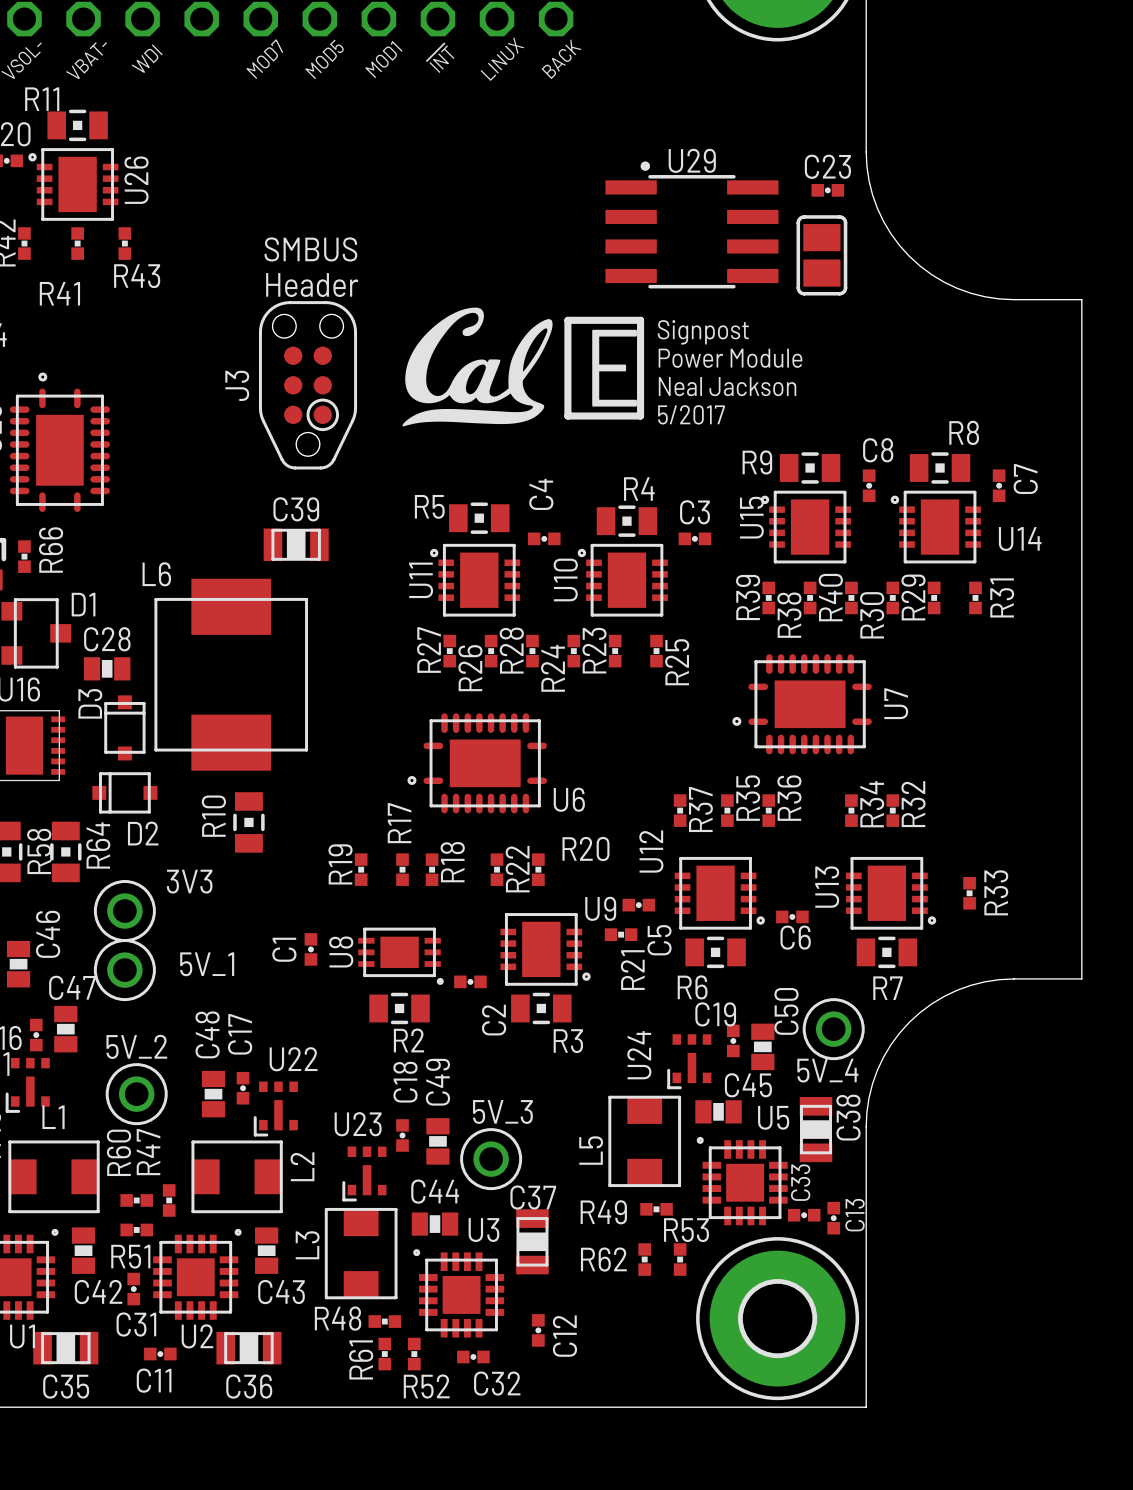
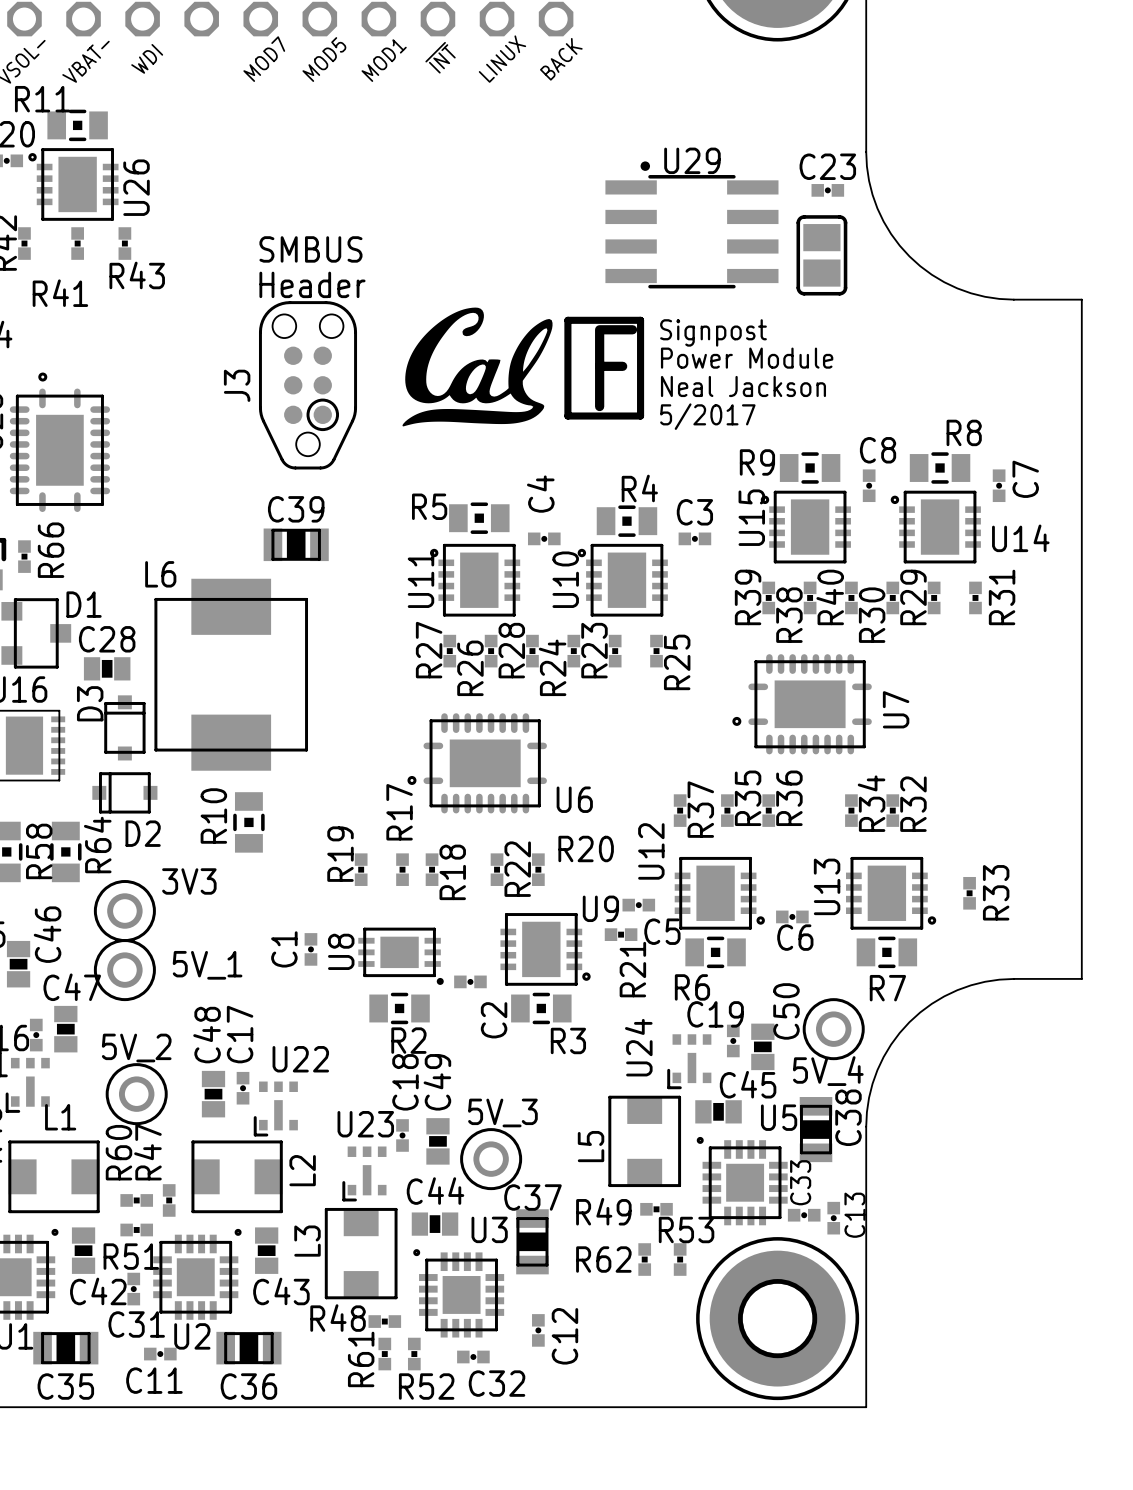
text: E (614, 368) -> F (616, 368)
C5 name rotation: 0° (659, 940) -> 90° clockwise (662, 931)

